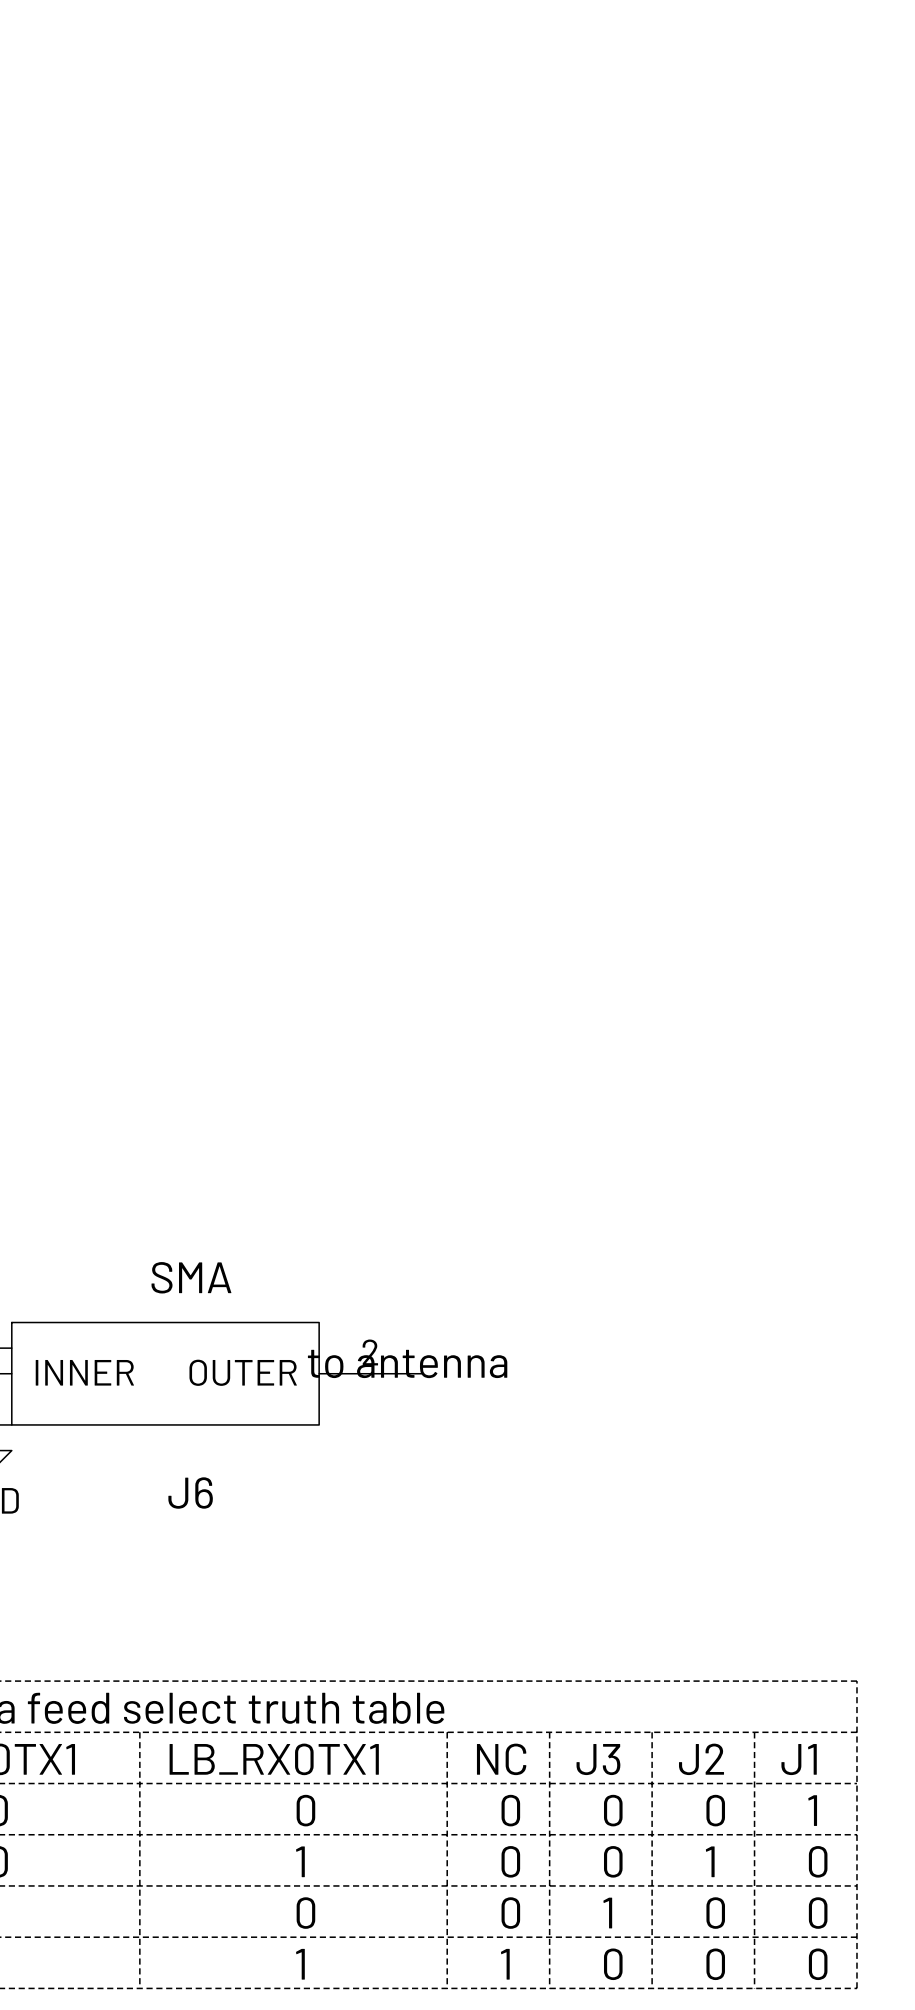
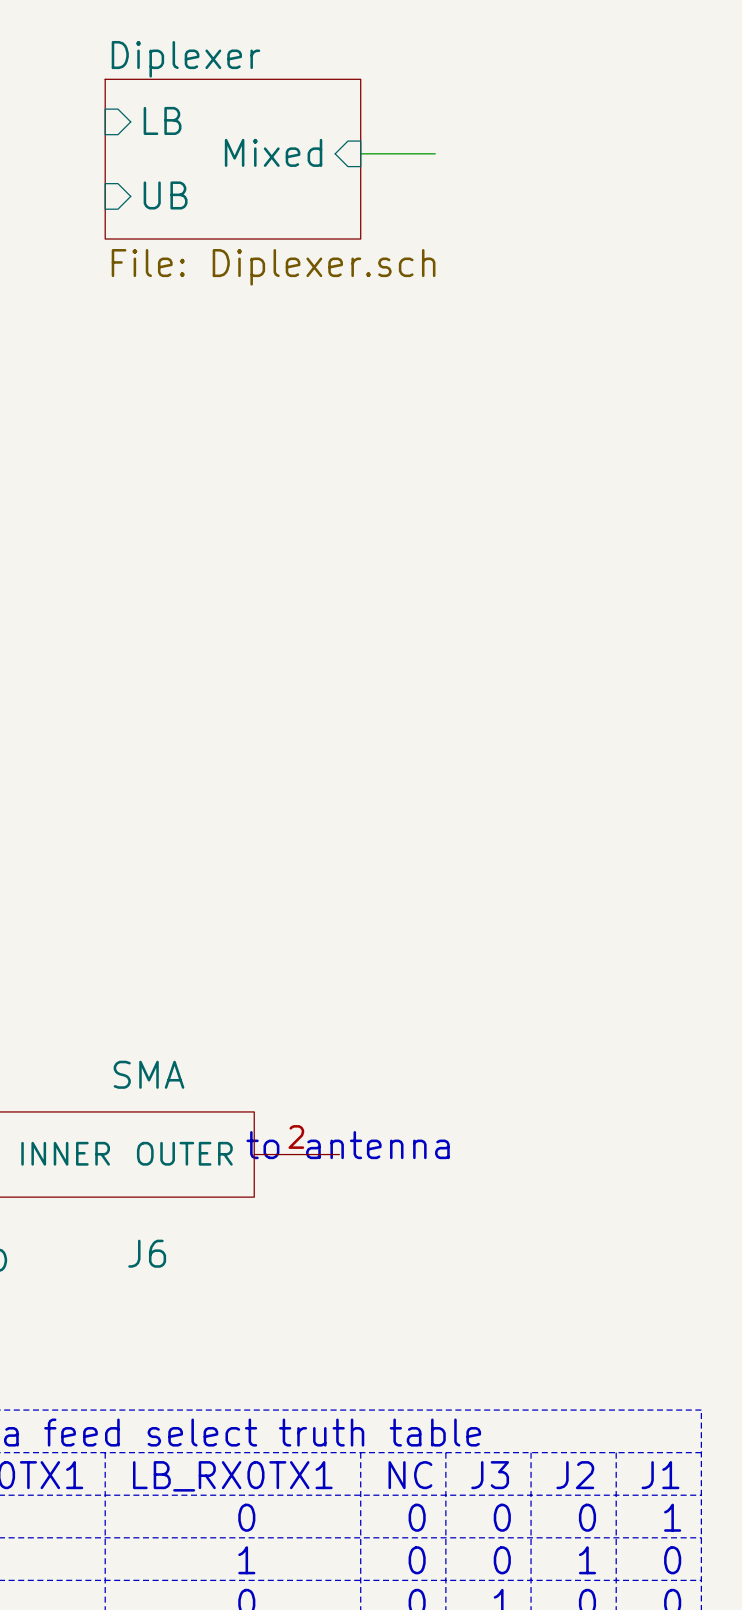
sheet pin: none -> LB (162, 120)
sheet pin: none -> Mixed (273, 152)
wire: none -> (360, 153) (435, 153)
sheet Diplexer: none -> File: Diplexer.sch (232, 159)
sheet pin: none -> UB (165, 195)

